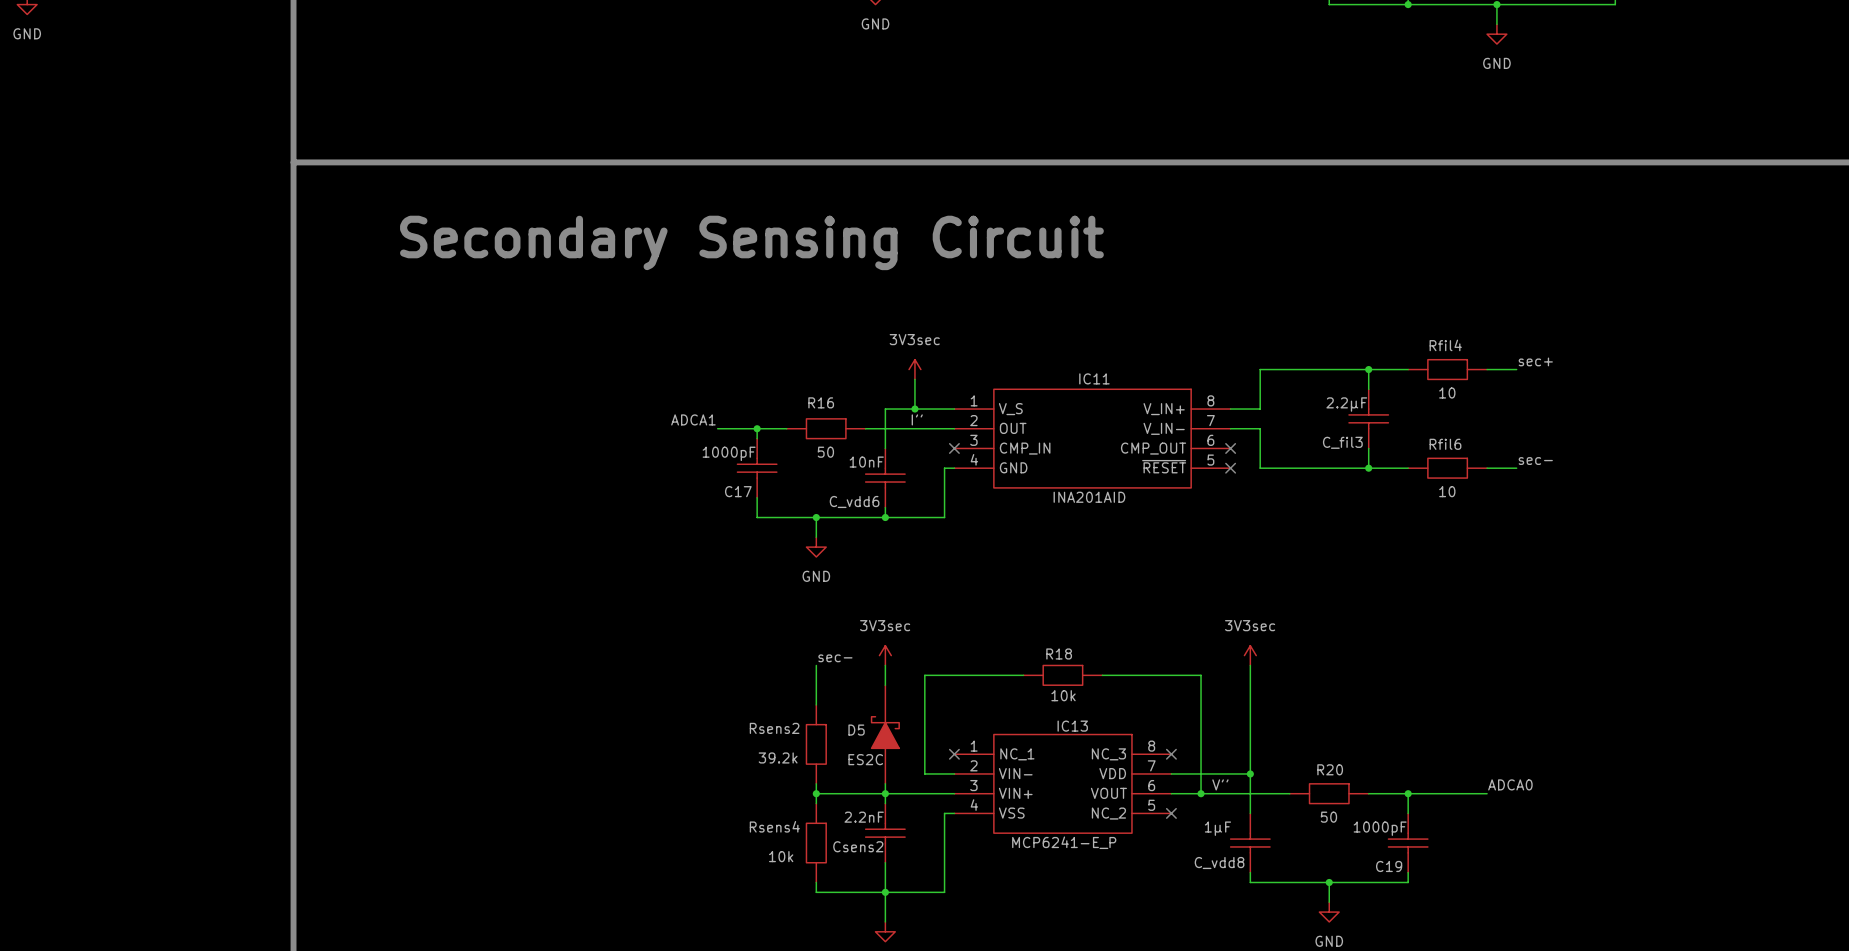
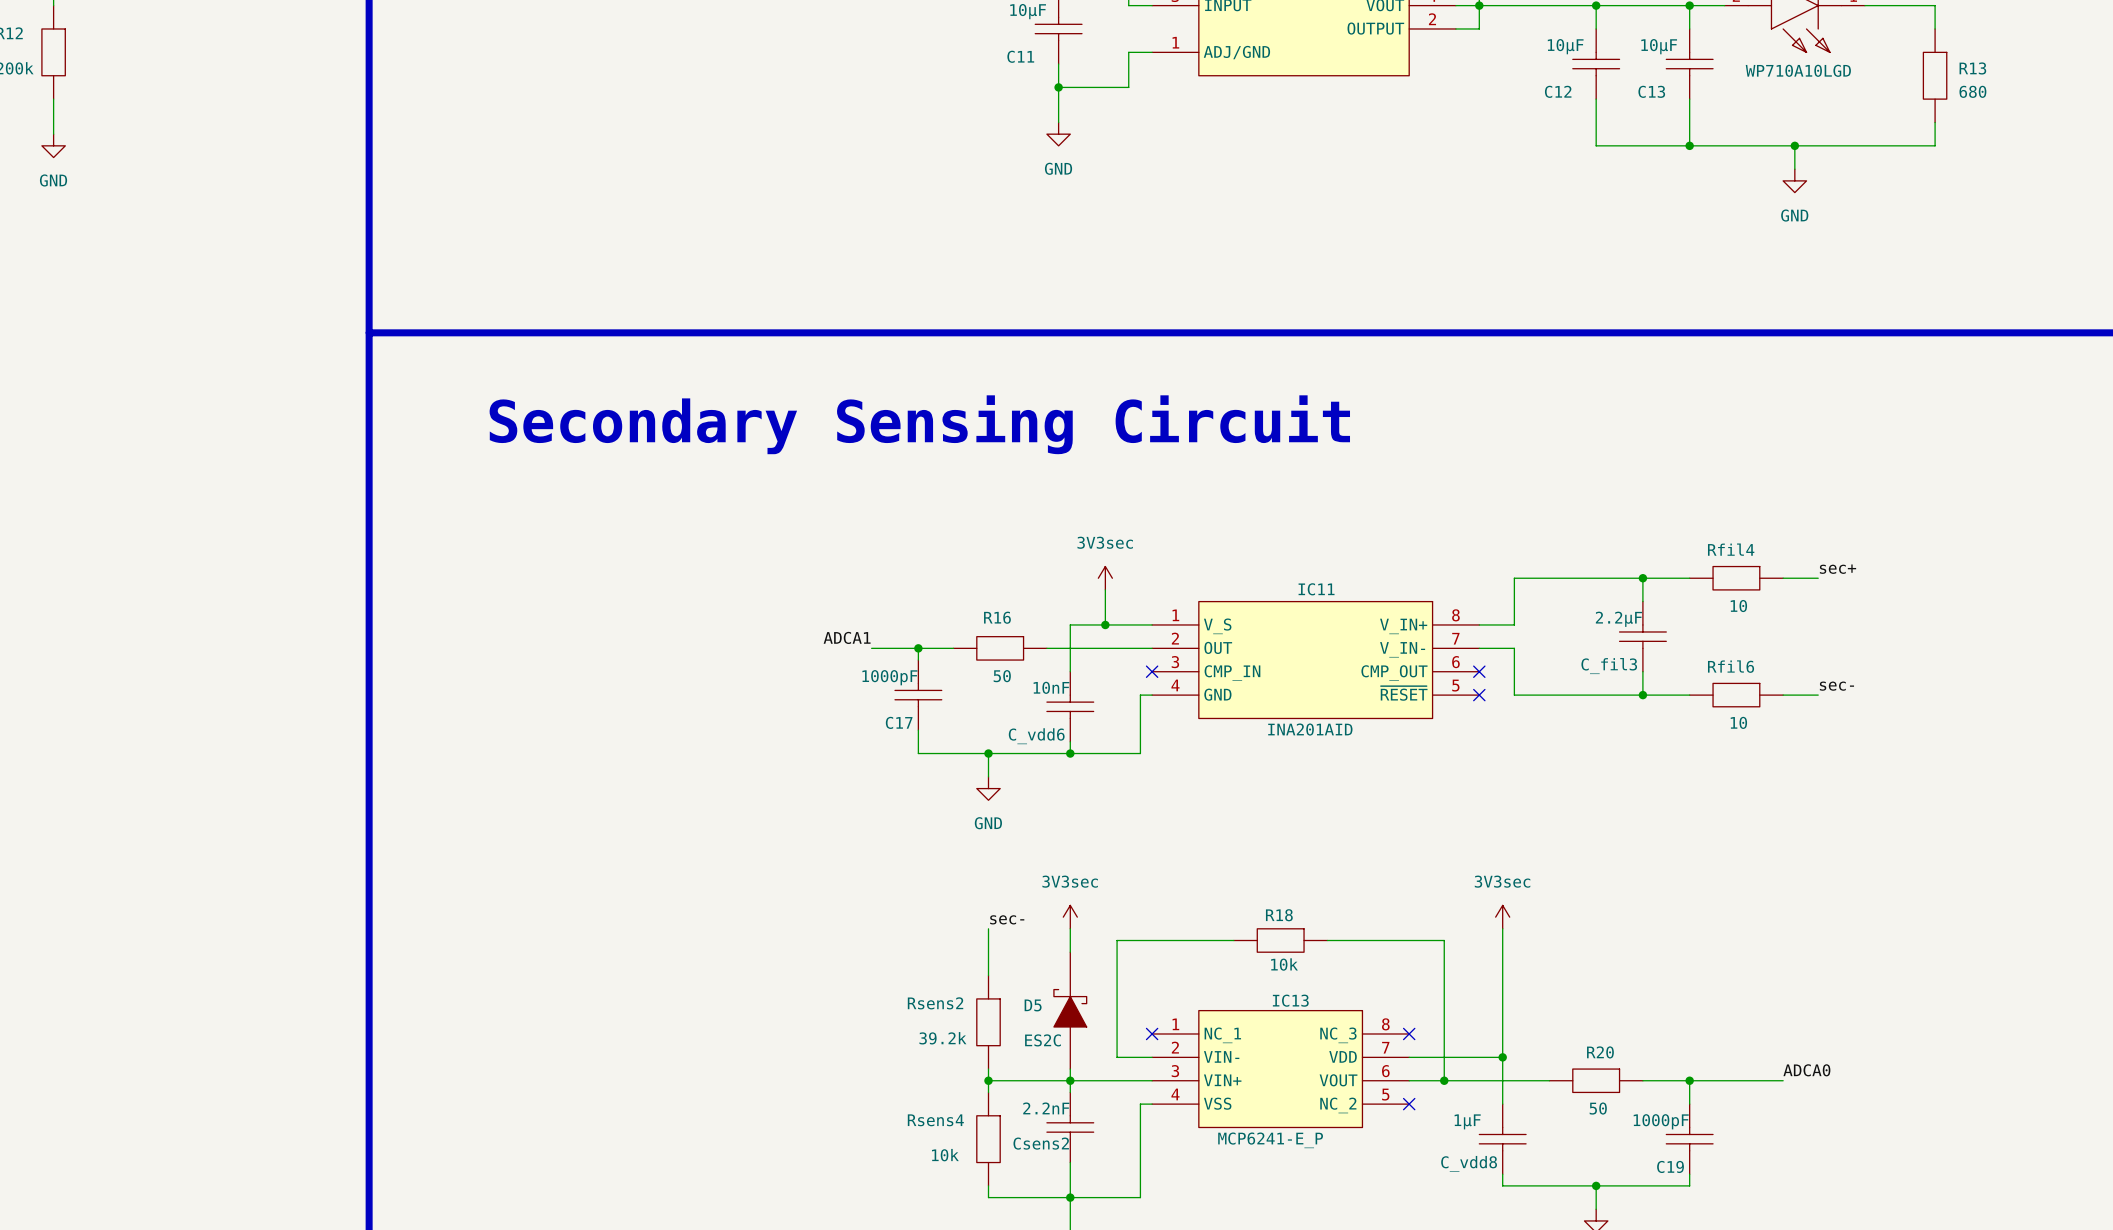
label: I'' (917, 419) -> none
label: V'' (1220, 784) -> none

